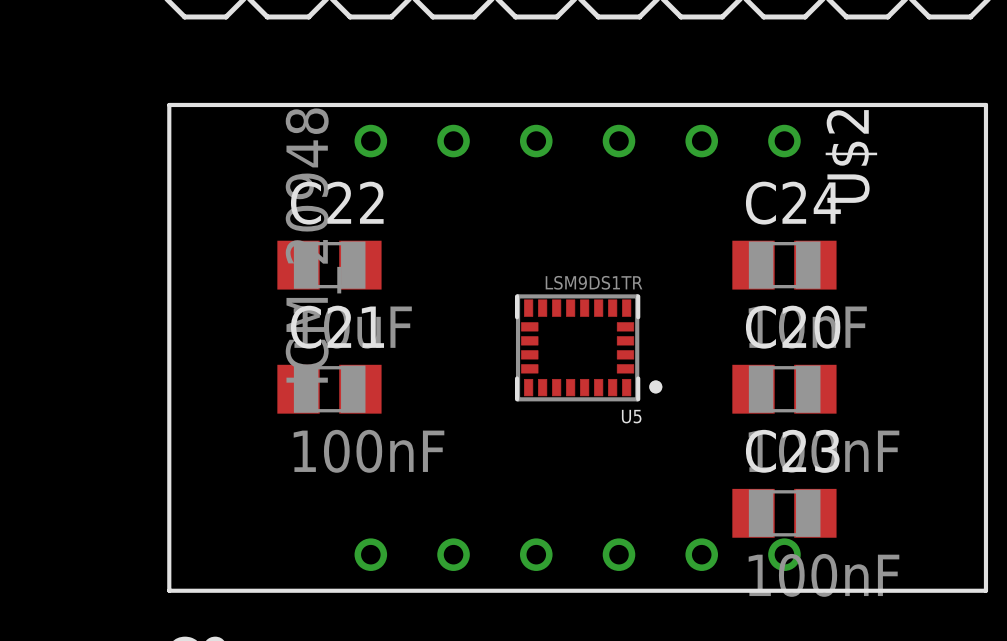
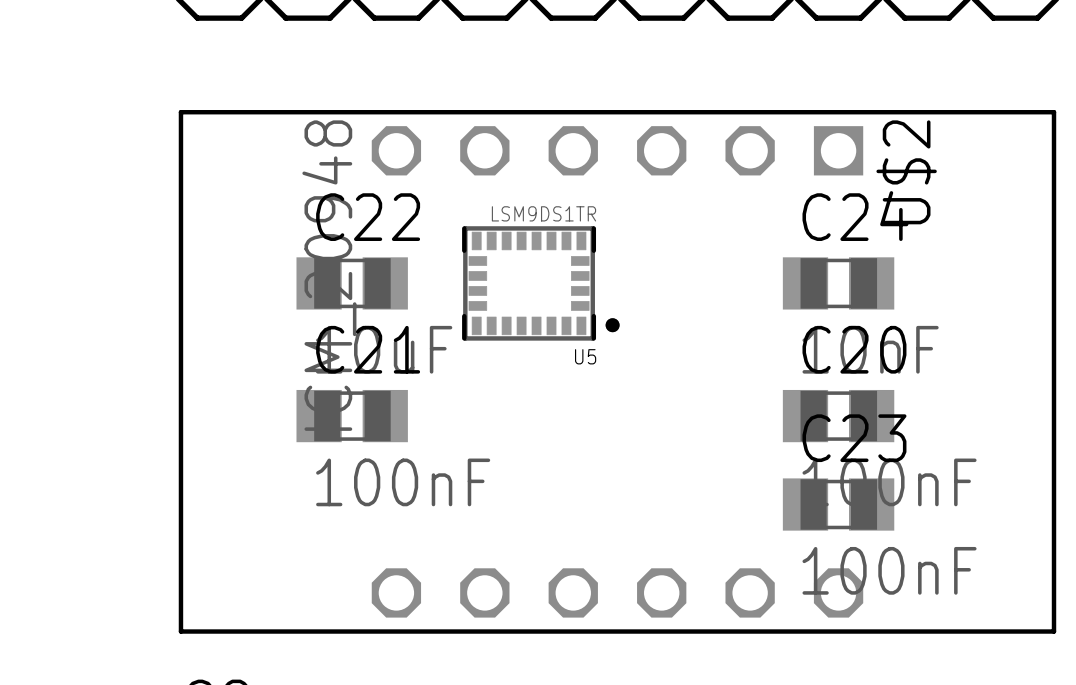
U$2 footprint: [167, 102, 989, 593] -> [178, 110, 1057, 634]
U5 position: (588, 347) -> (540, 283)
C23 position: (784, 513) -> (838, 504)

